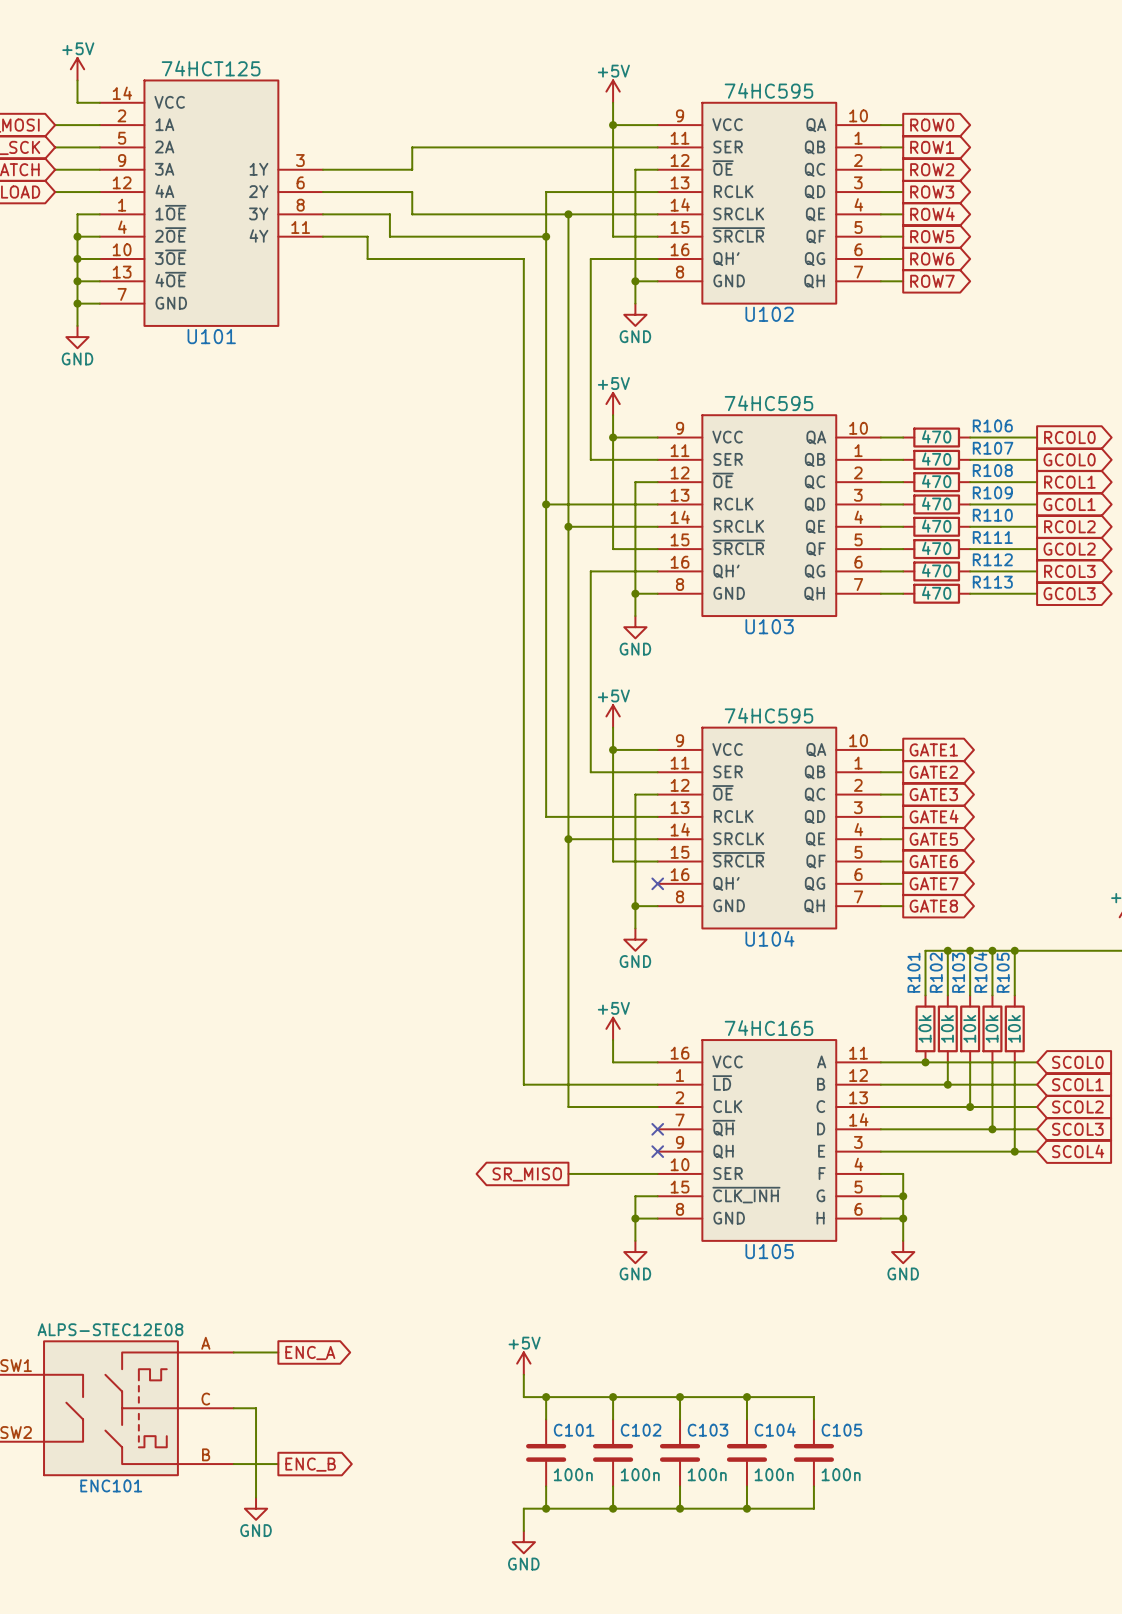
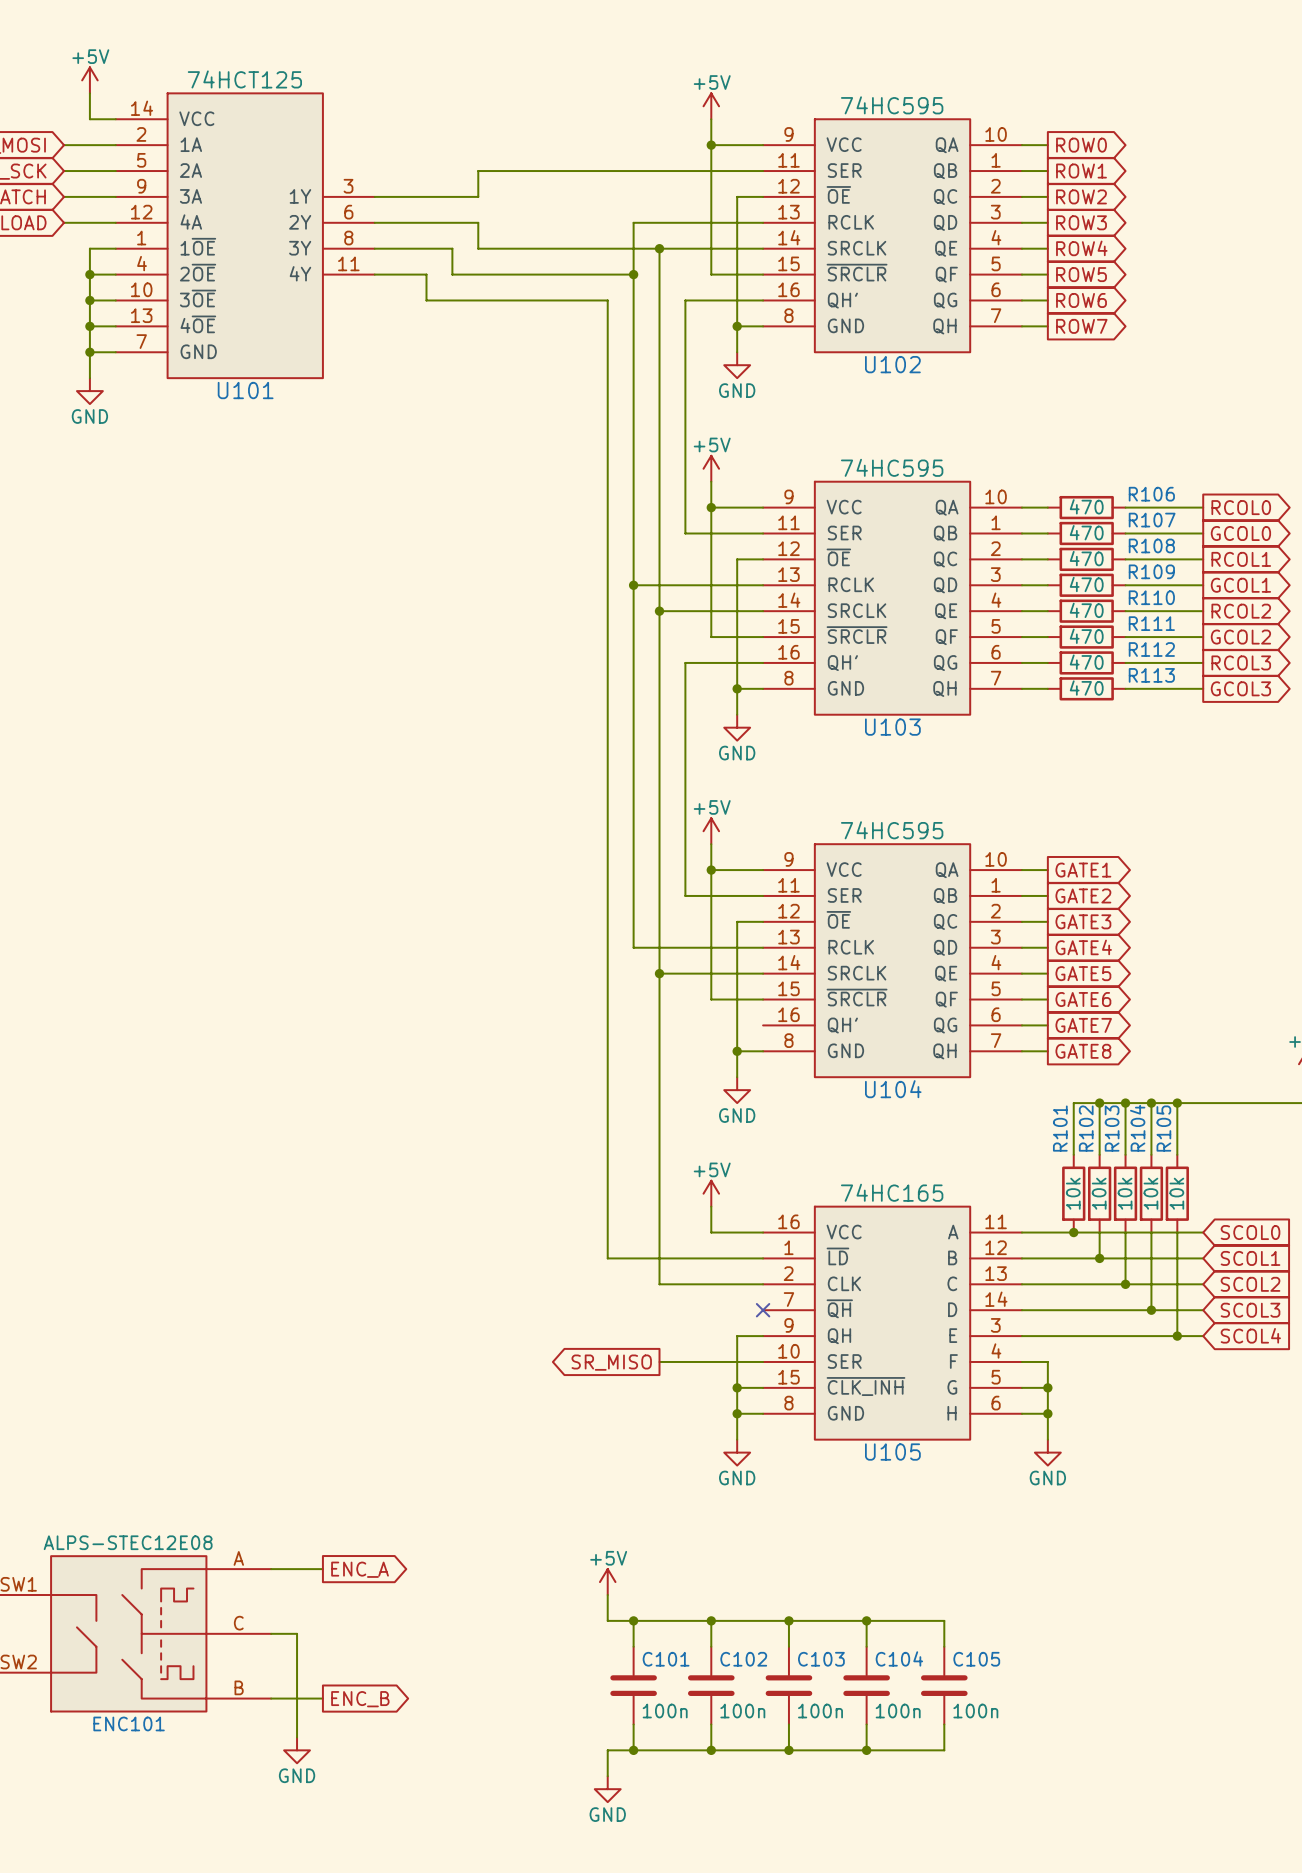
no-connect mark: (657, 883) -> none
wire: none -> (763, 1336) (737, 1336) (737, 1387)
no-connect mark: (657, 1151) -> none
junction: none -> (737, 1387)

